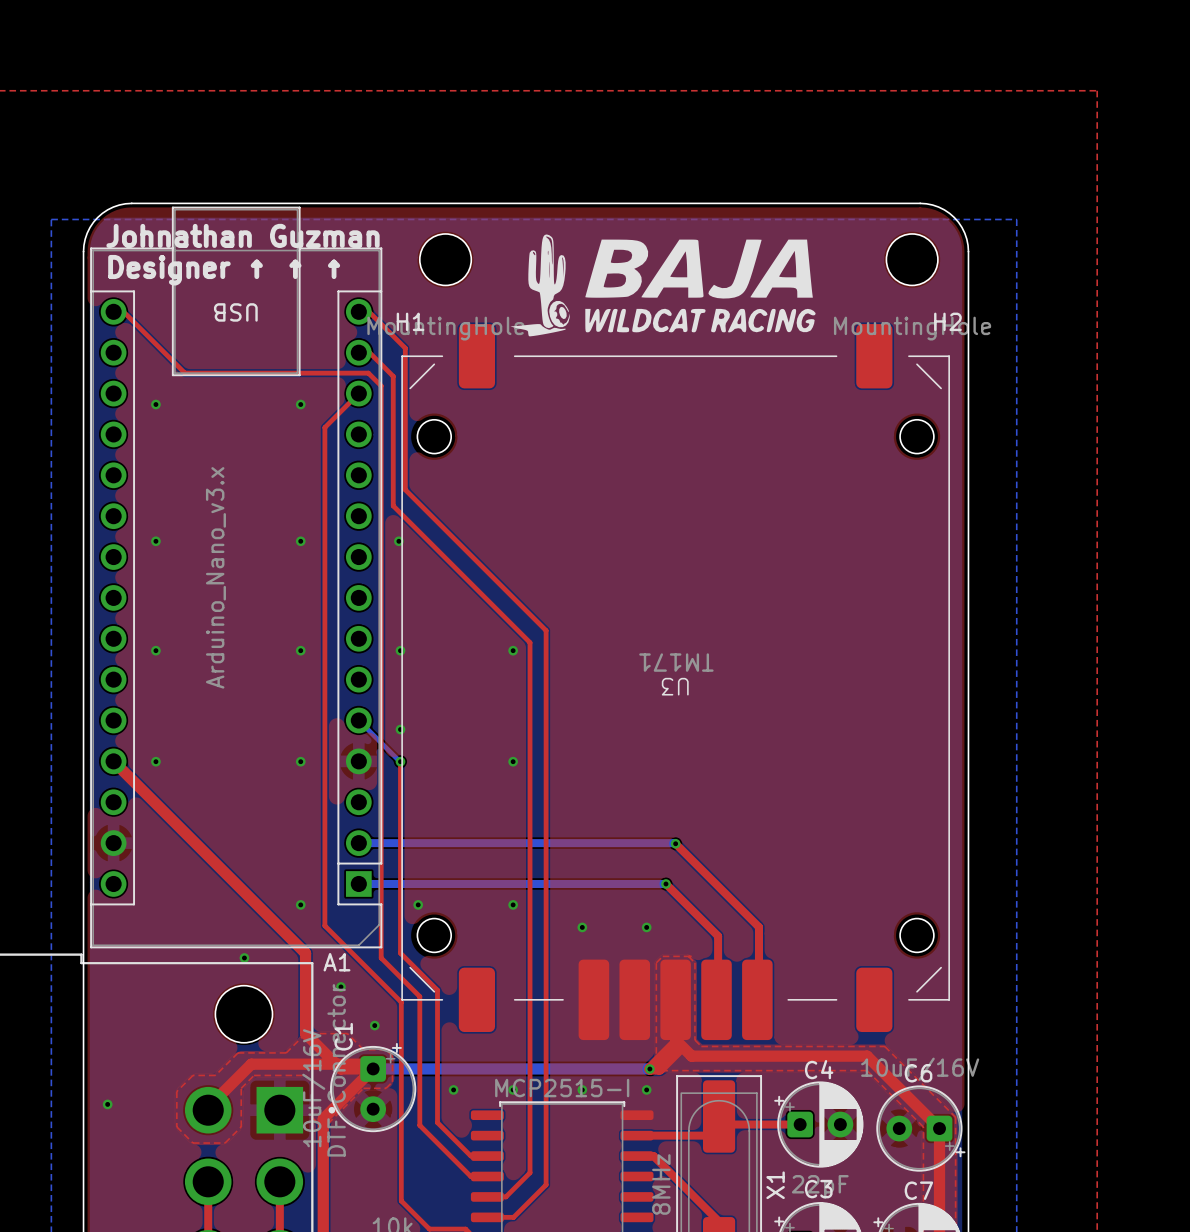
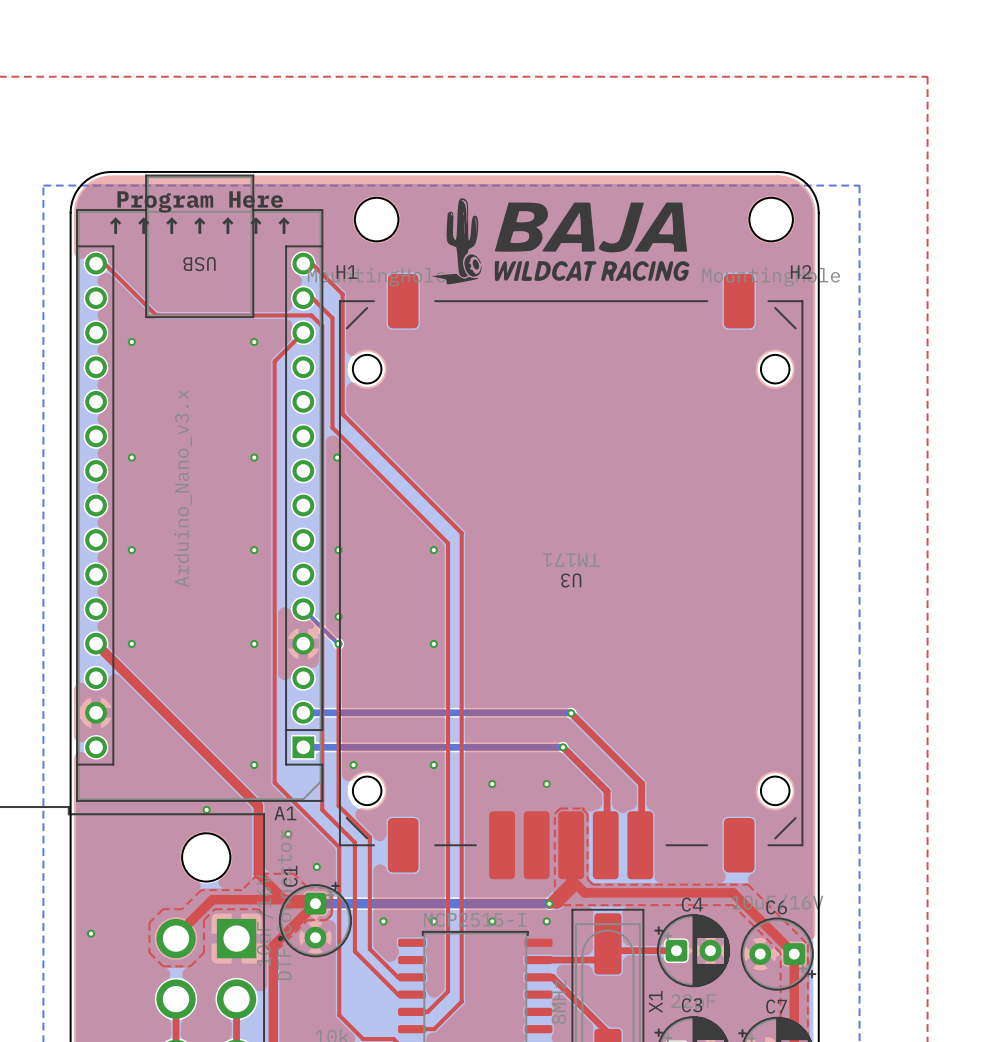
text: Johnathan Guzman (243, 235) -> none
text: none -> Program Here (200, 201)
text: none -> ↑ ↑ ↑ ↑ ↑ ↑ ↑ (199, 225)
text: Designer ↑ ↑ ↑ (224, 270) -> none

